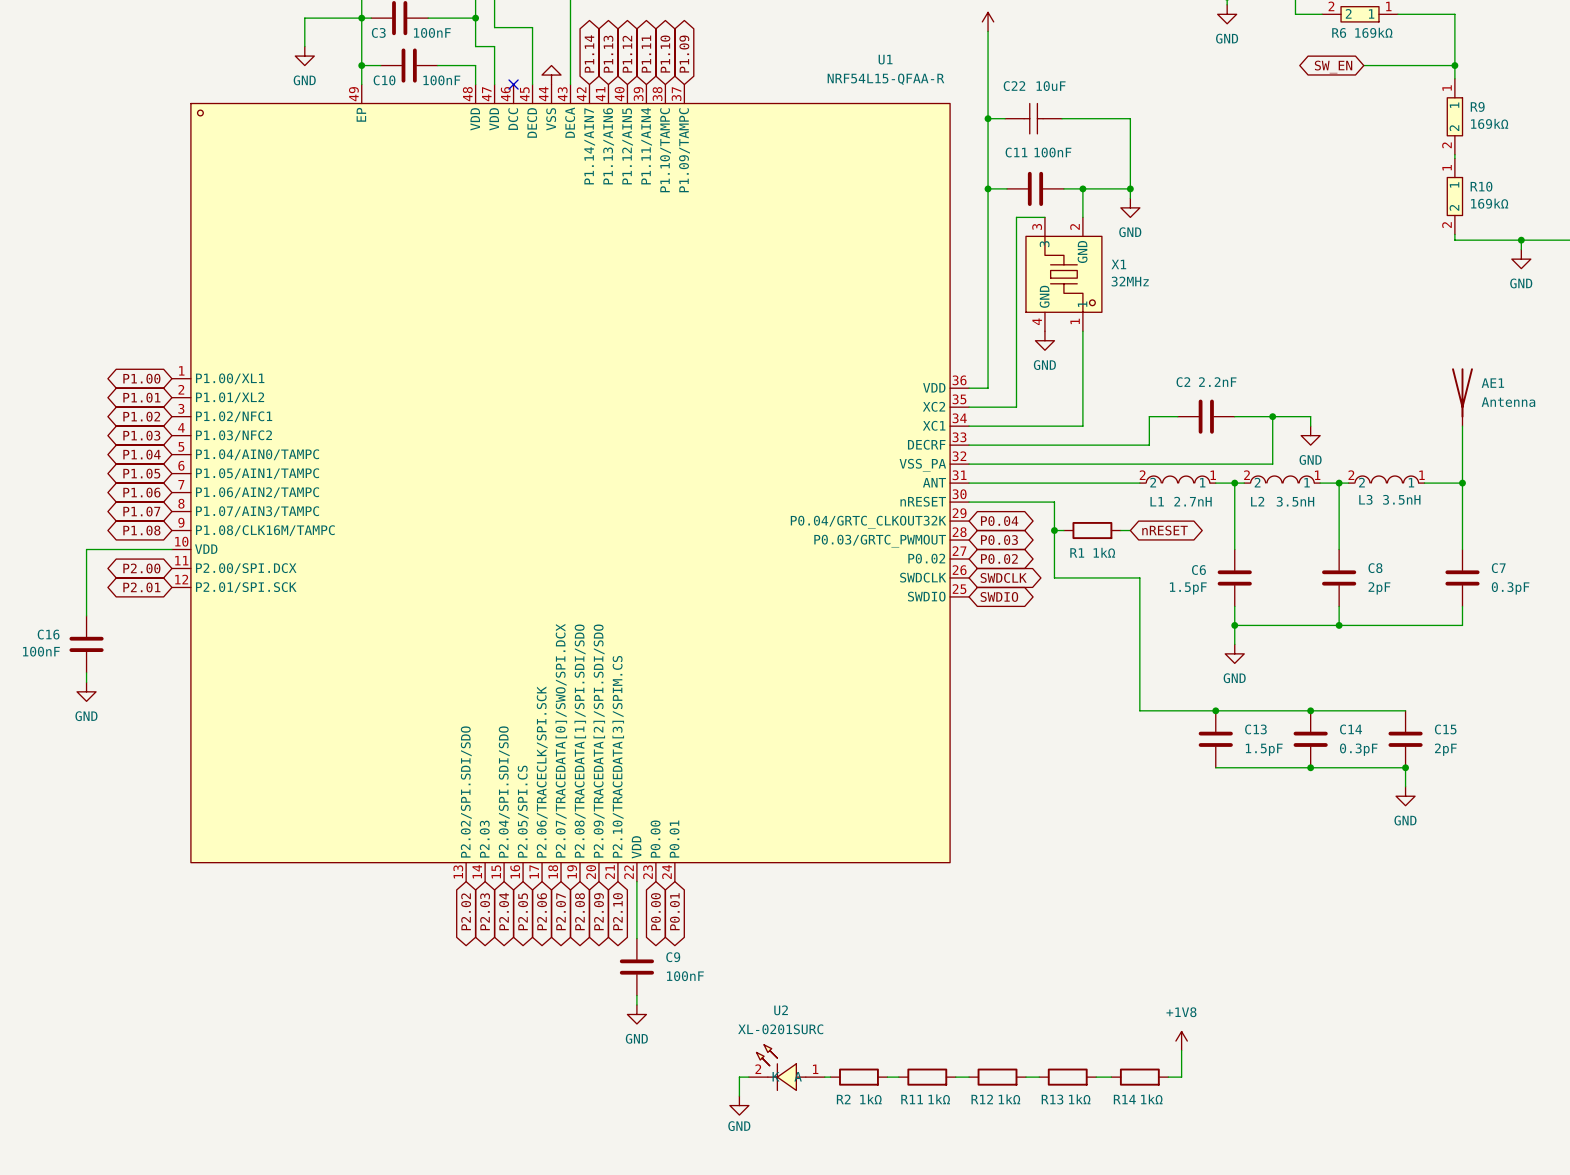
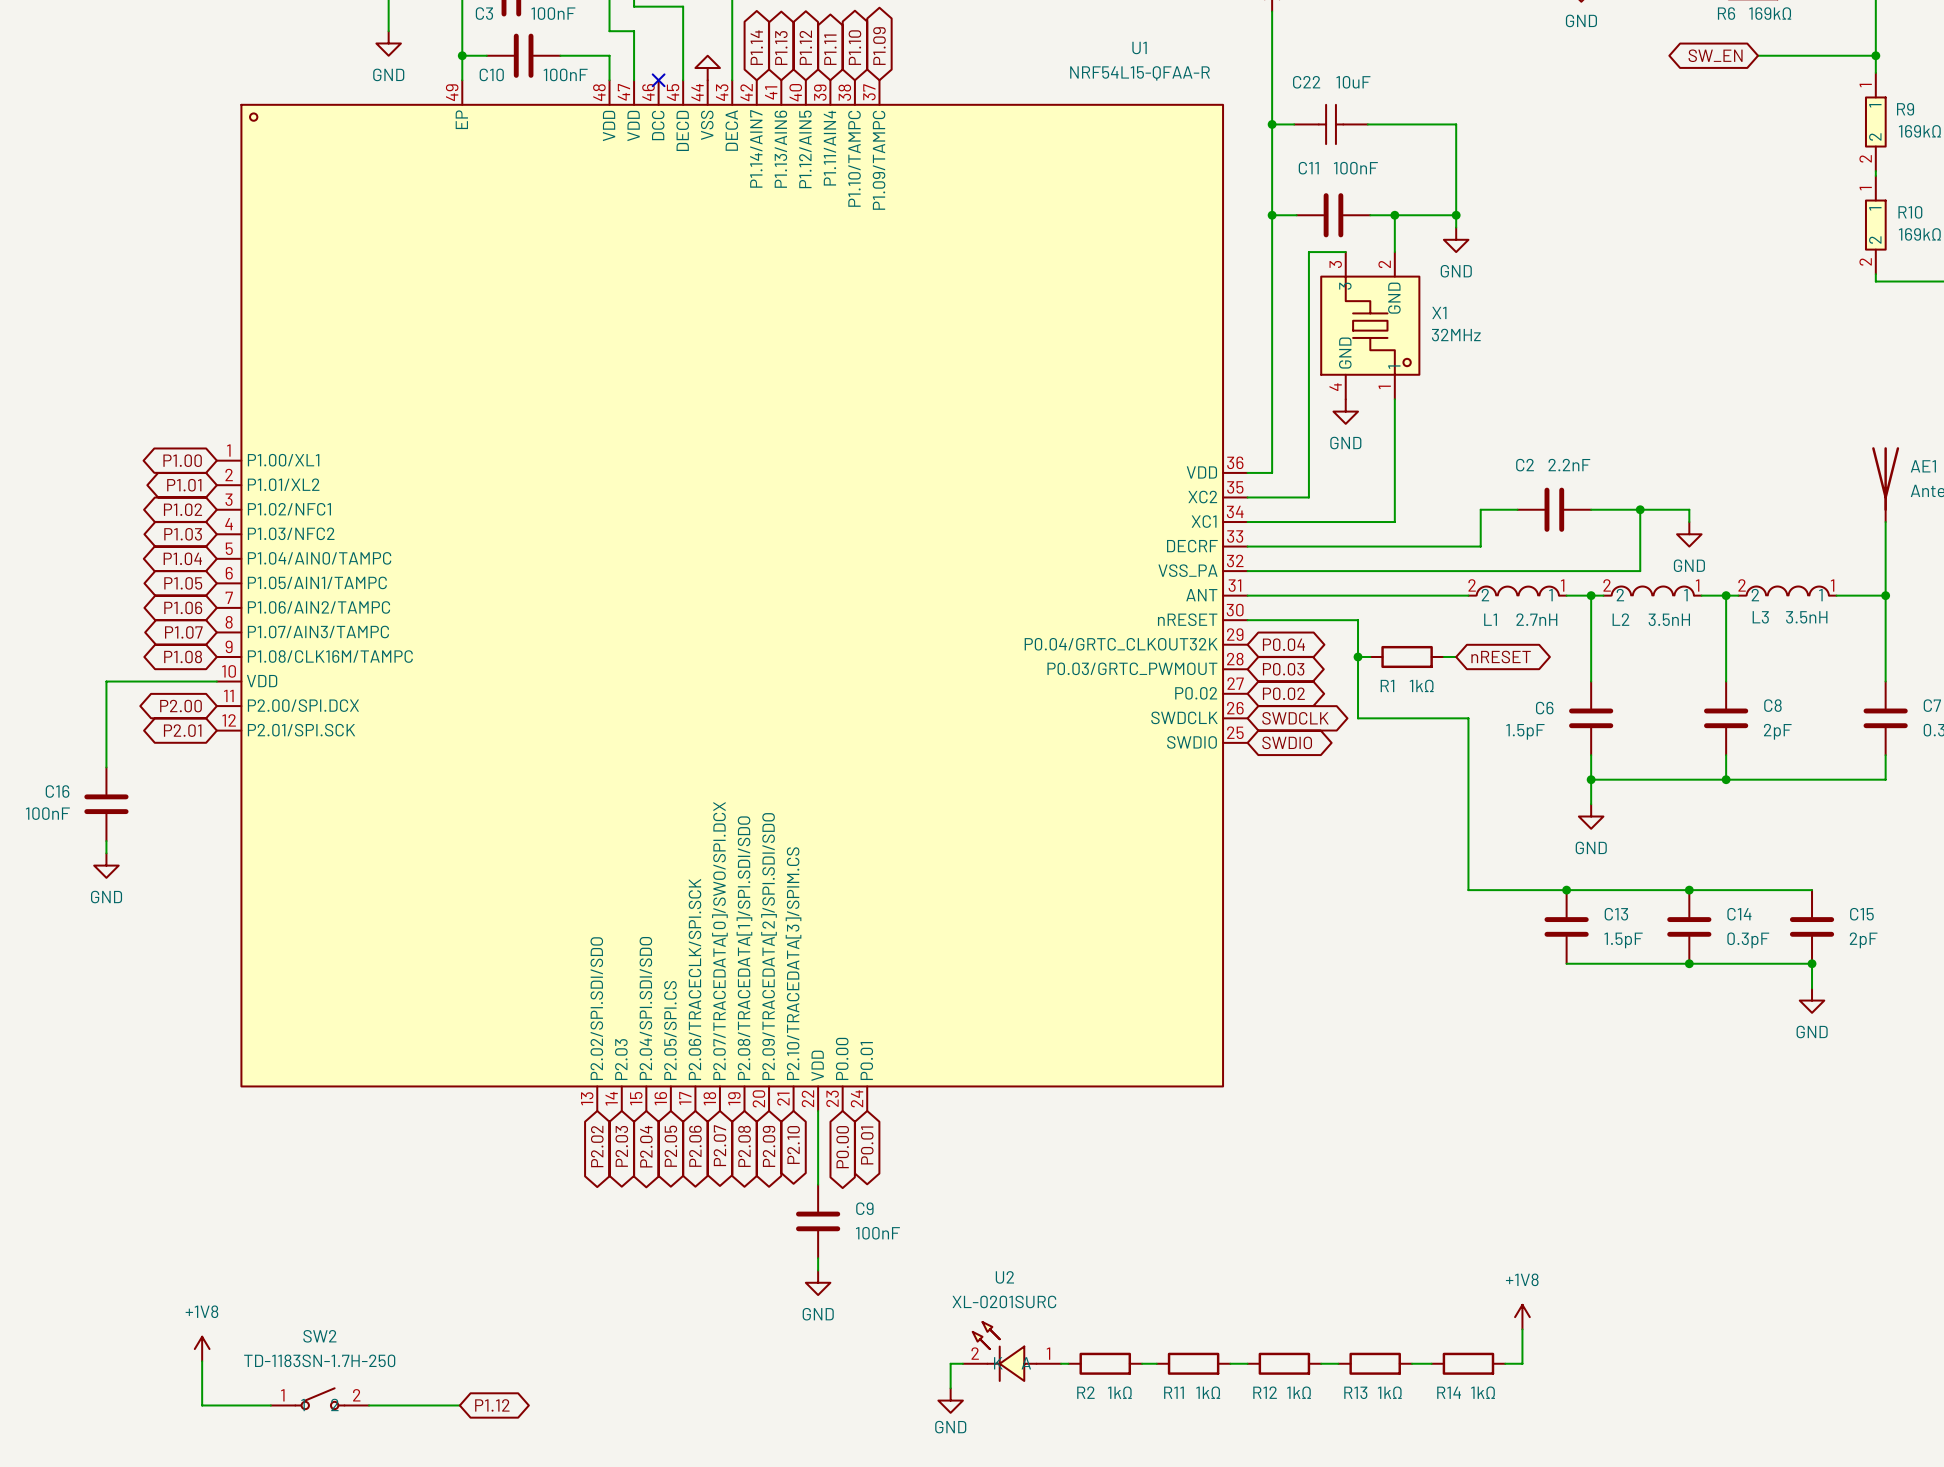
power symbol: none -> +1V8 (202, 1349)
wire: none -> (202, 1361) (202, 1405) (270, 1405)
SW2: none -> TD-1183SN-1.7H-250 (319, 1398)
wire: none -> (369, 1405) (459, 1405)
global label: none -> P1.12 (492, 1405)

